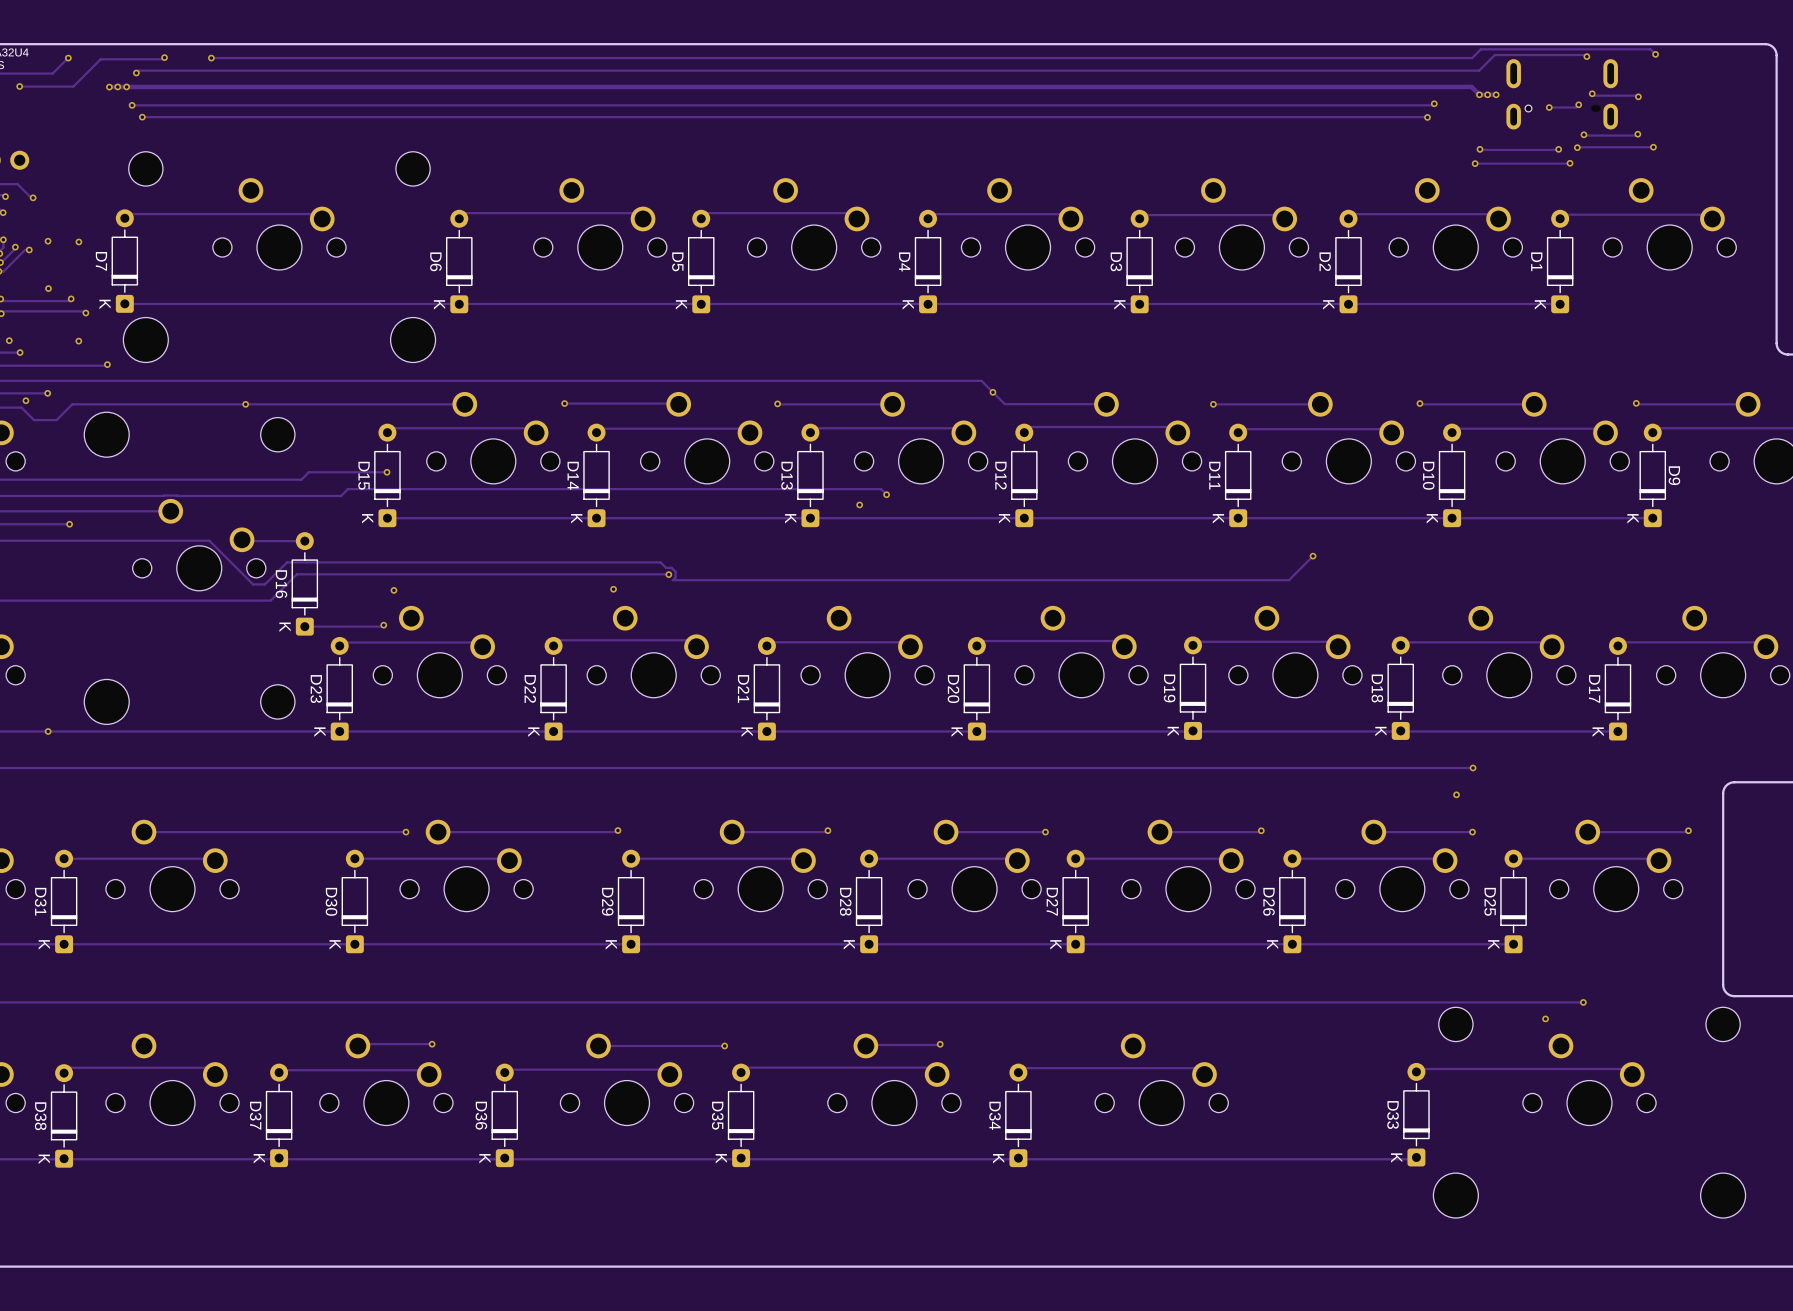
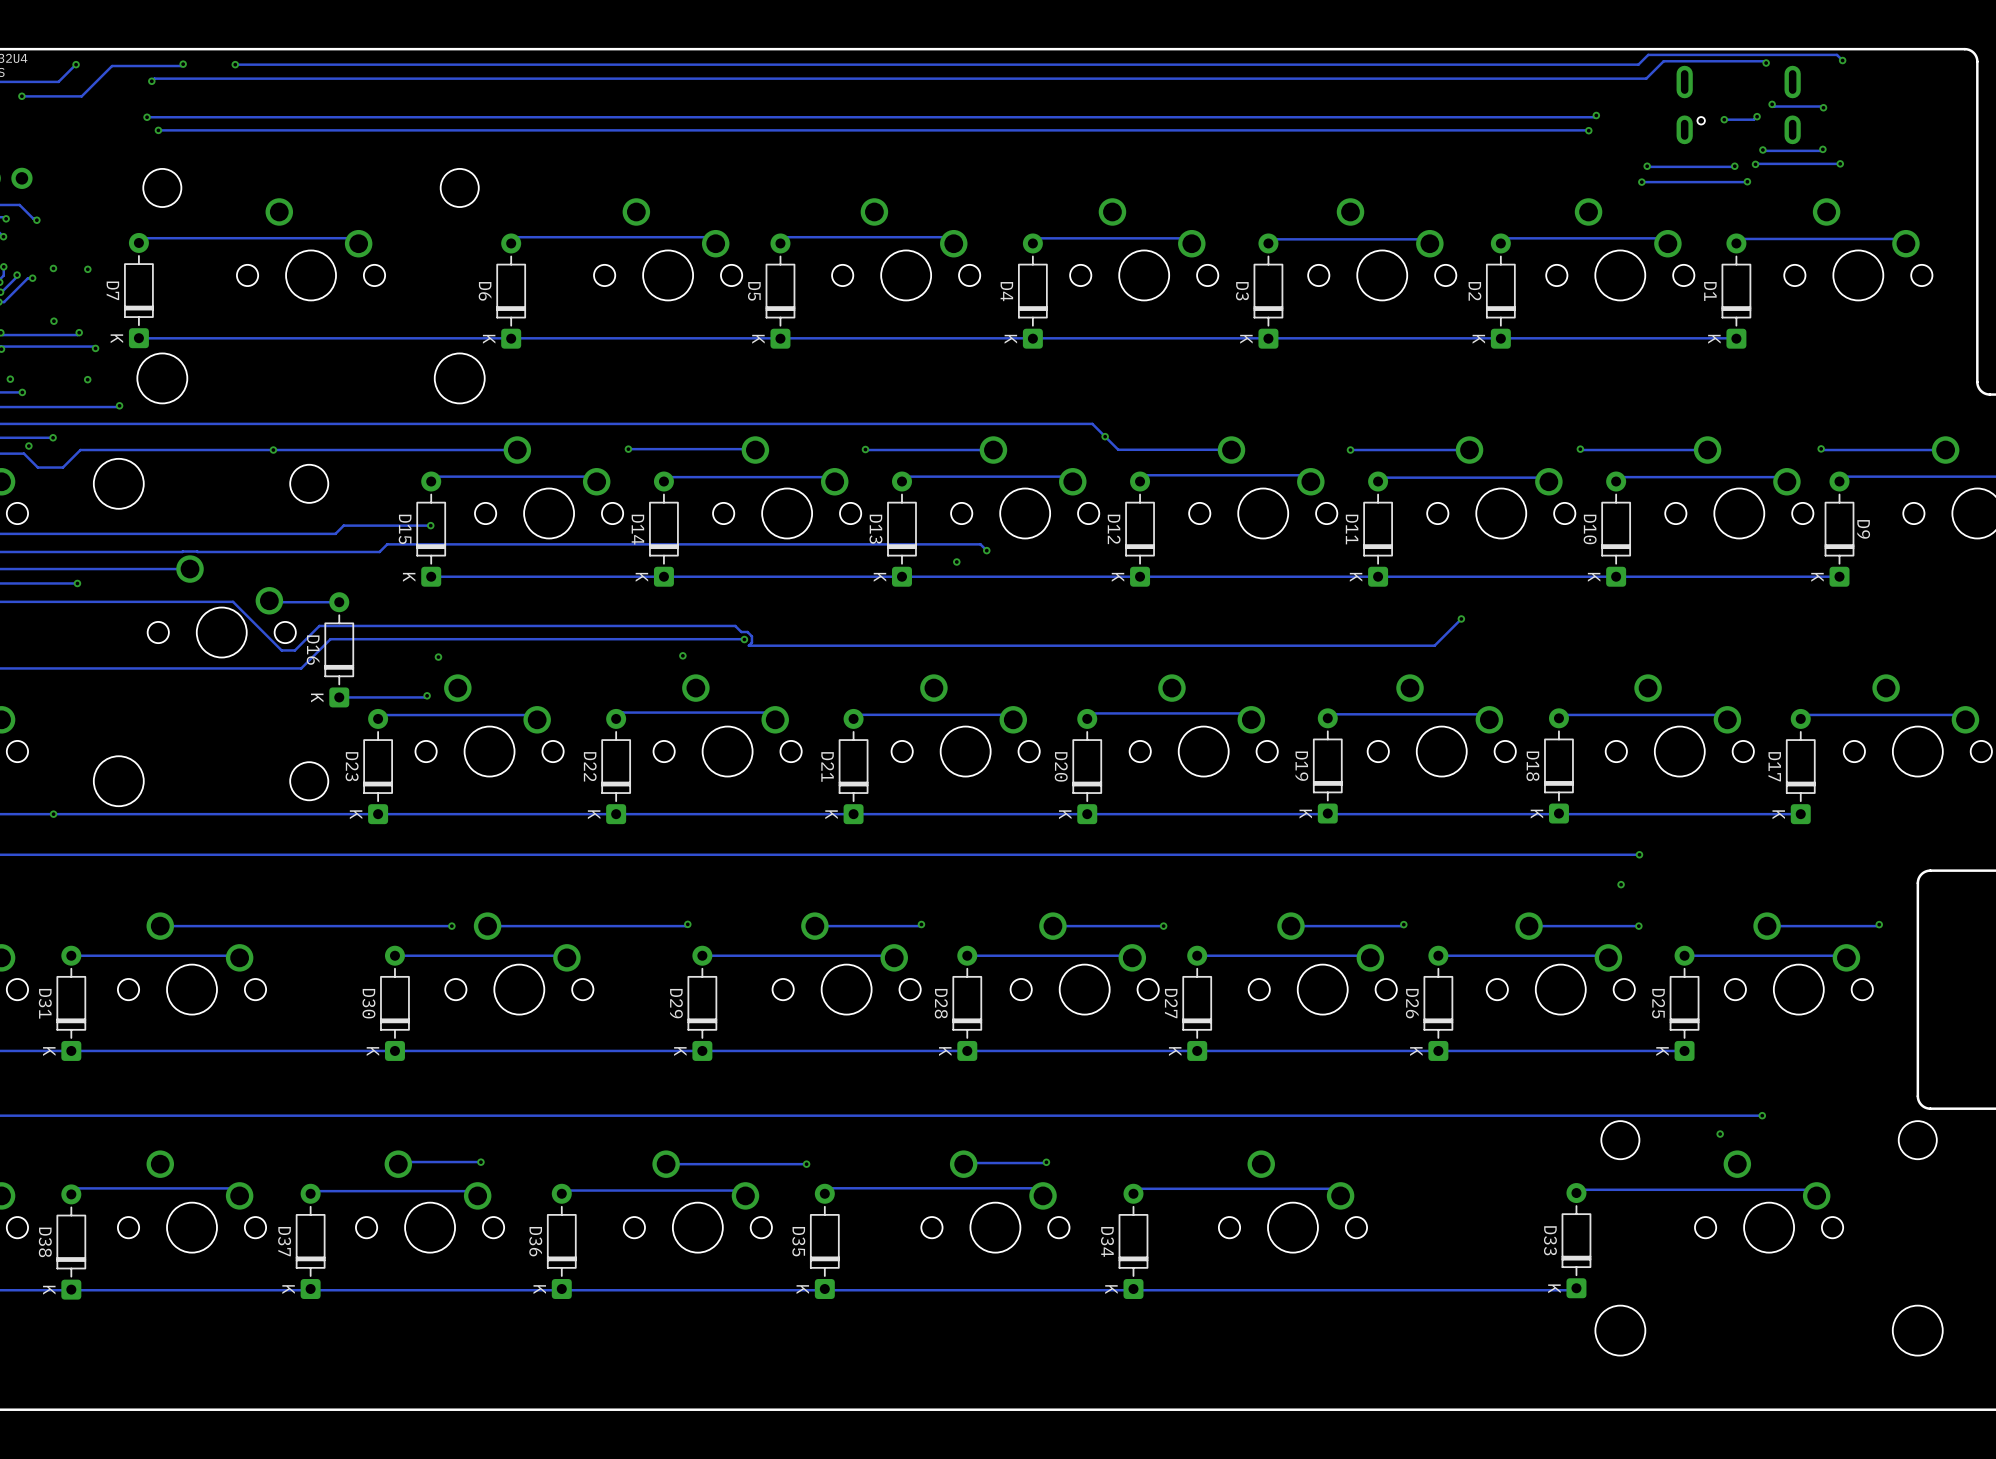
track: (109, 86) (1471, 86) (1479, 94) (1496, 94) -> none
via: (117, 86) -> none
via: (126, 86) -> none
via: (109, 87) -> none
via: (1479, 94) -> none
via: (1487, 94) -> none
via: (1496, 94) -> none

